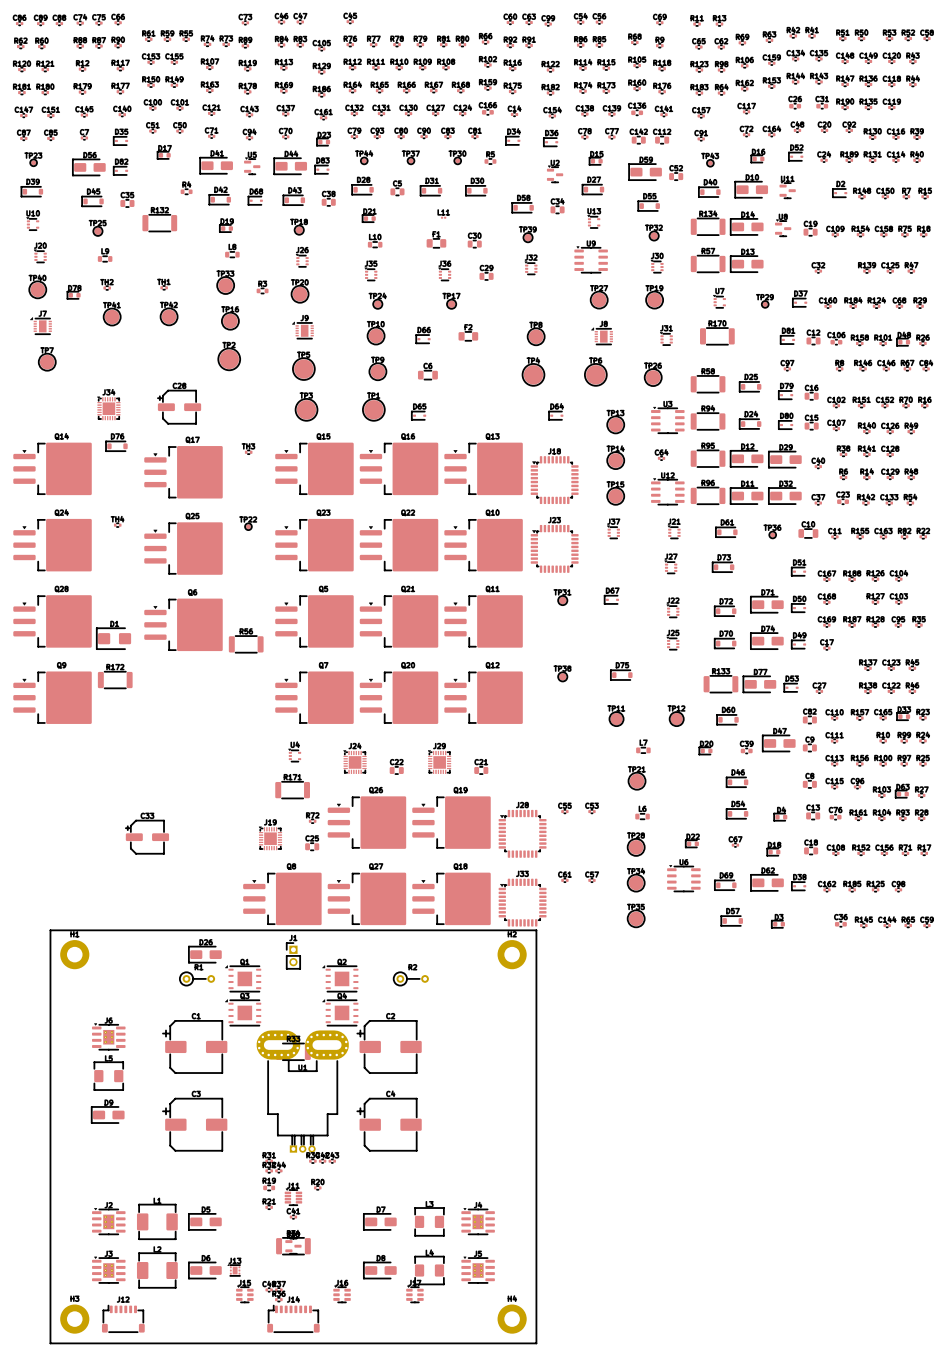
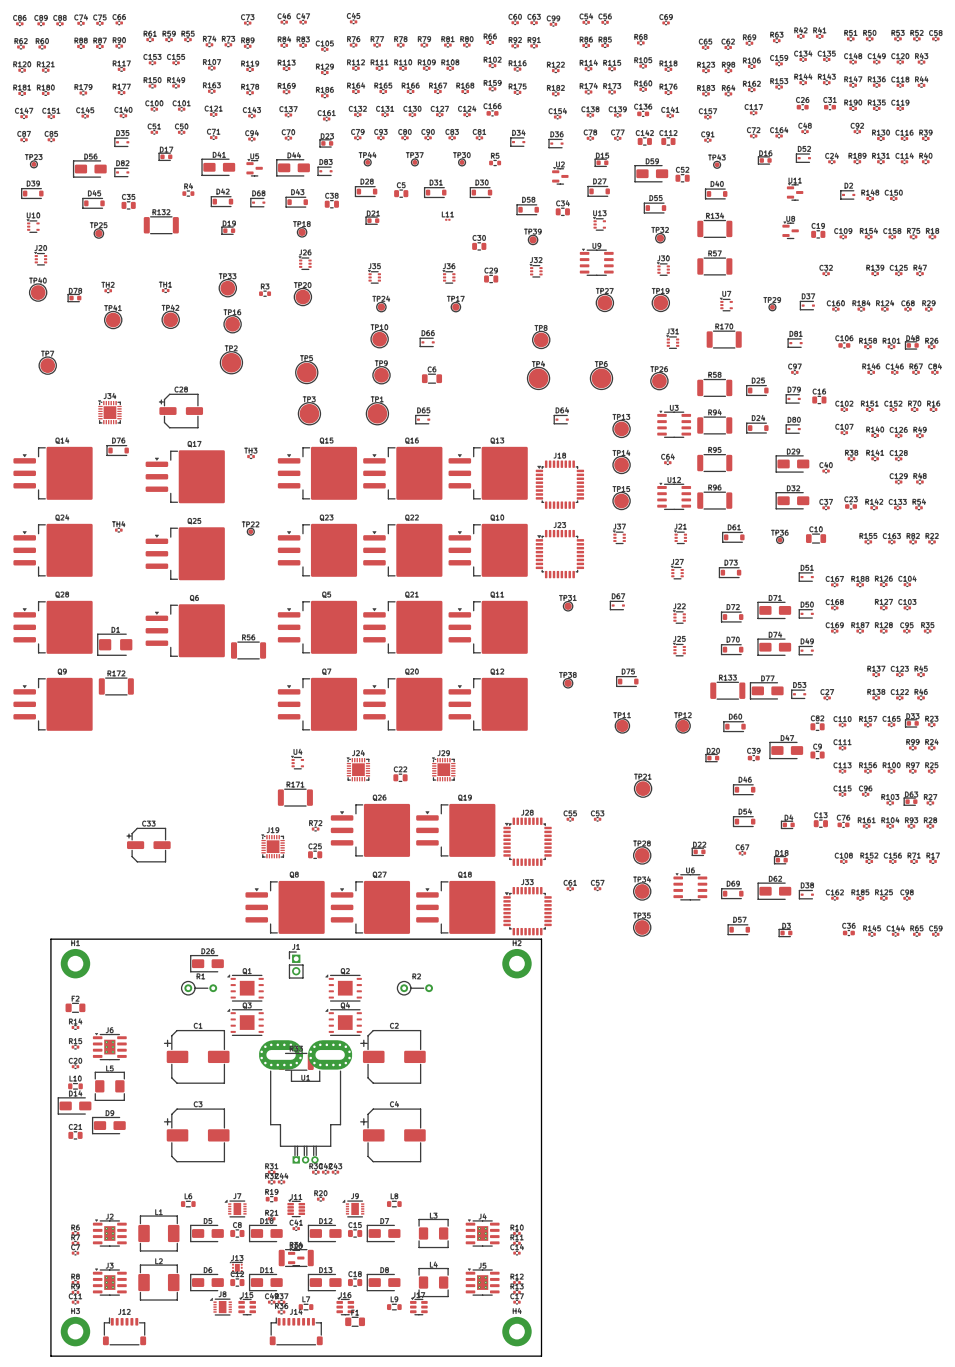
part position: (697, 24) -> (516, 1243)
part position: (719, 24) -> (516, 1292)
part position: (659, 45) -> (75, 1292)
part position: (82, 69) -> (516, 1282)
part position: (514, 114) -> (516, 1253)
part position: (824, 130) -> (75, 1066)
part position: (84, 138) -> (75, 1253)
part position: (751, 189) -> (266, 1233)
part position: (906, 196) -> (75, 1243)
part position: (925, 196) -> (75, 1047)
part position: (746, 226) -> (74, 1105)
part position: (436, 243) -> (355, 1321)
part position: (375, 244) -> (75, 1086)
part position: (232, 254) -> (394, 1204)
part position: (105, 258) -> (394, 1307)
part position: (746, 264) -> (324, 1282)
part position: (41, 325) -> (235, 1208)
part position: (302, 330) -> (353, 1208)
part position: (468, 336) -> (75, 1007)
part position: (602, 336) -> (220, 1306)
part position: (813, 340) -> (237, 1282)
part position: (839, 368) -> (75, 1282)
part position: (811, 426) -> (355, 1233)
part position: (746, 458) -> (324, 1233)
part position: (843, 477) -> (75, 1233)
part position: (866, 477) -> (75, 1027)
part position: (746, 496) -> (266, 1282)
part position: (834, 536) -> (75, 1302)
part position: (826, 648) -> (516, 1302)
part position: (883, 740) -> (516, 1233)
part position: (643, 750) -> (306, 1307)
part position: (481, 770) -> (75, 1135)
part position: (809, 784) -> (237, 1233)
part position: (642, 816) -> (188, 1204)
part position: (811, 850) -> (355, 1282)
part position: (233, 1270) -> (236, 1267)

